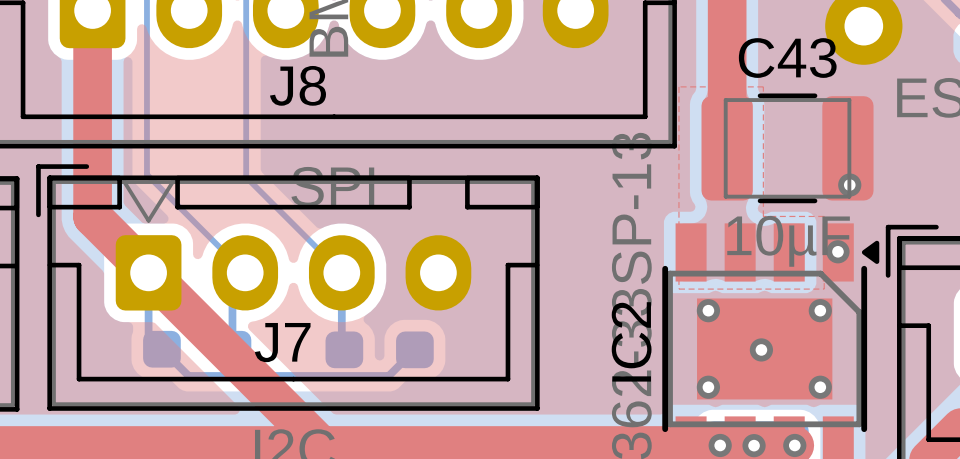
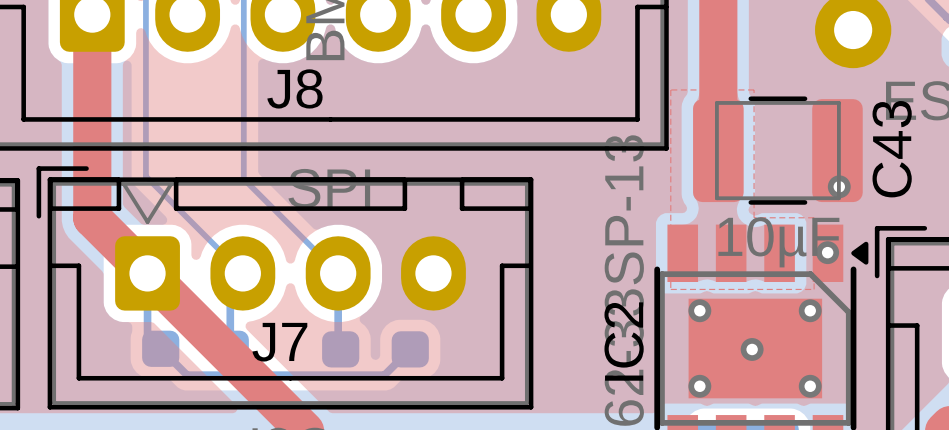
C43 name rotation: 0° (787, 58) -> 90° counterclockwise (892, 149)
C43 name position: C43 (787, 58) -> C43 (892, 149)

